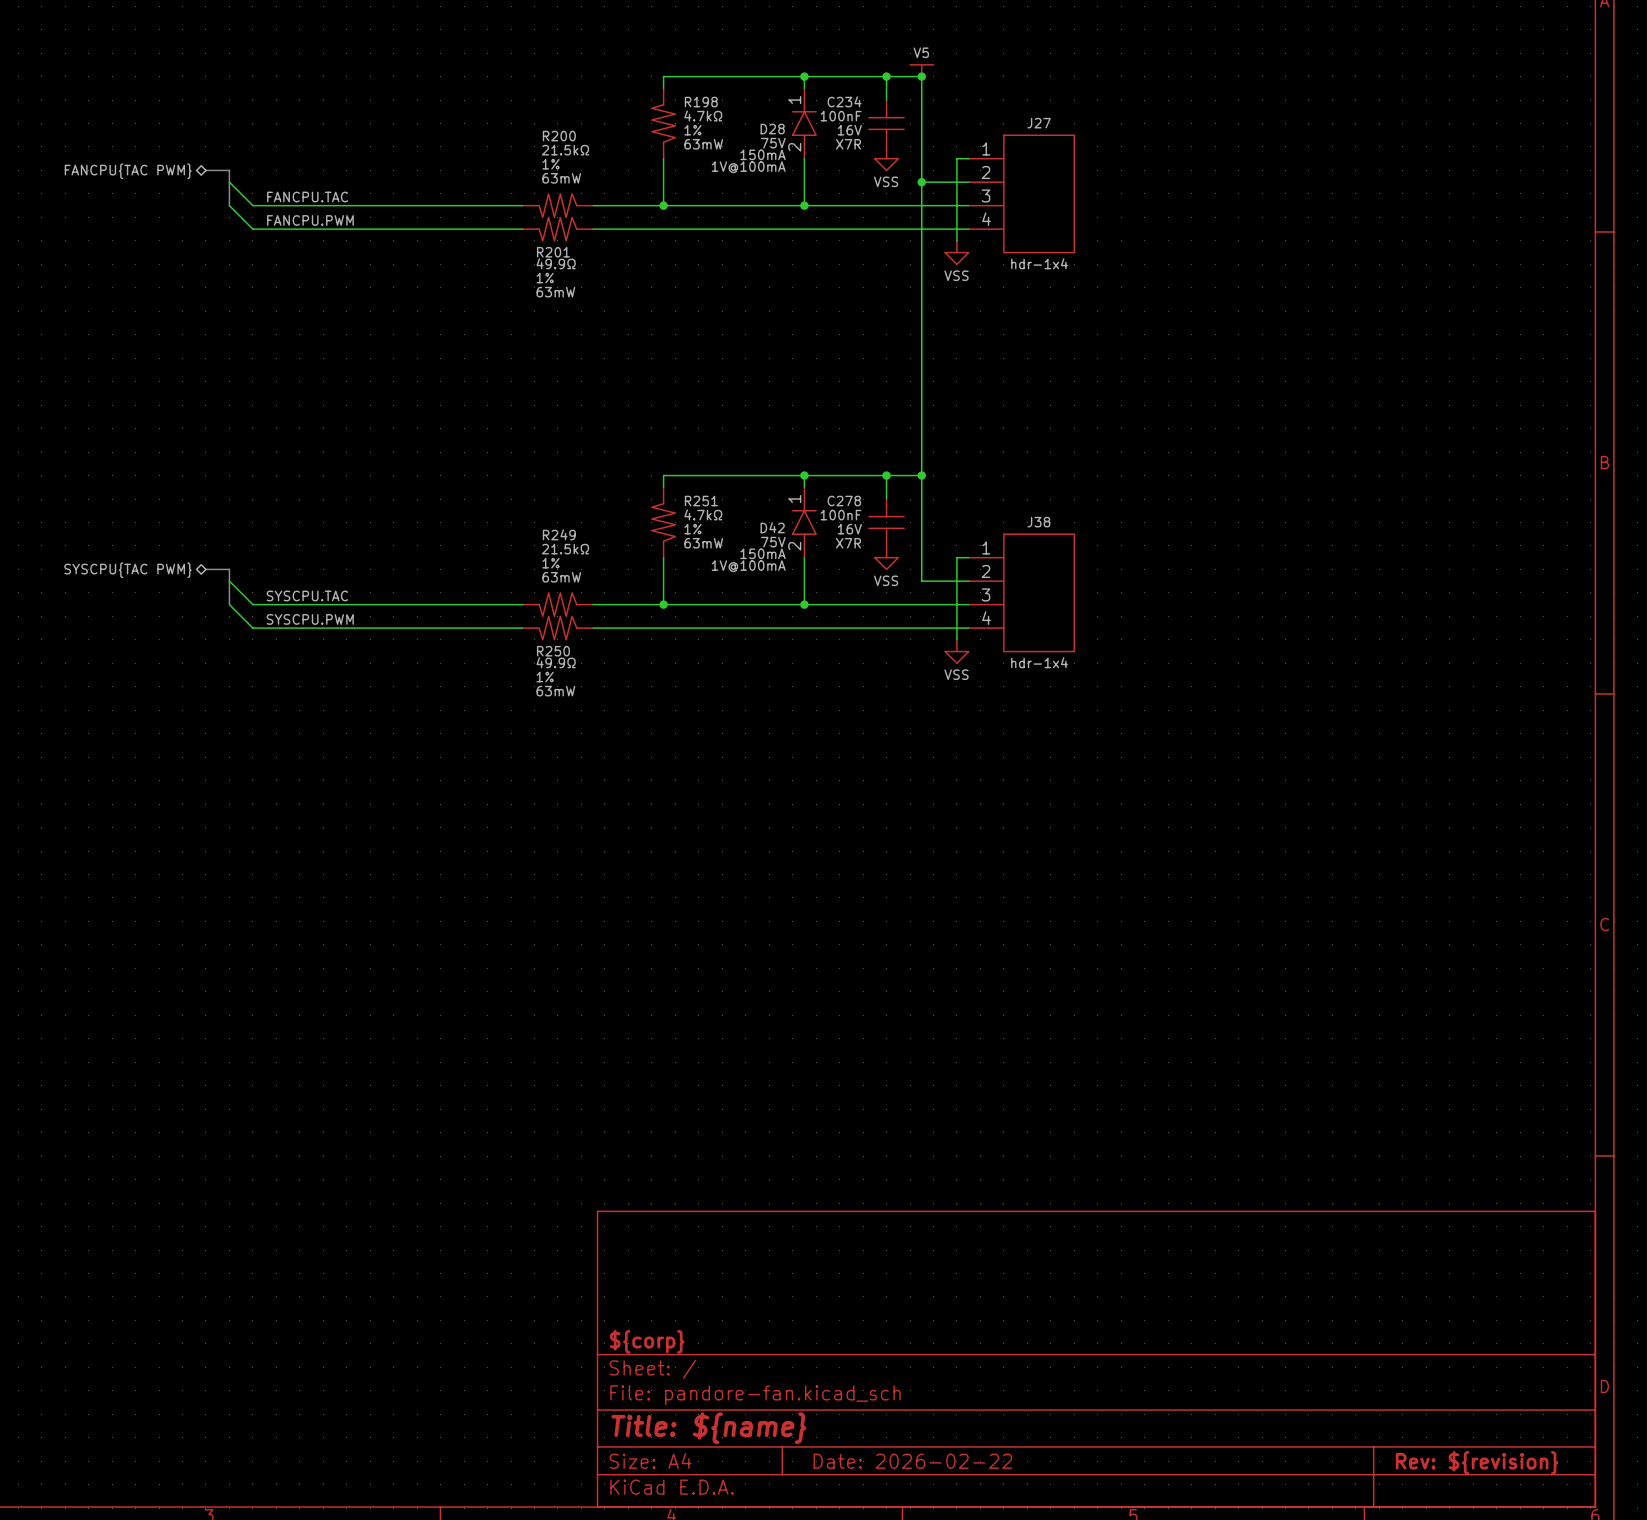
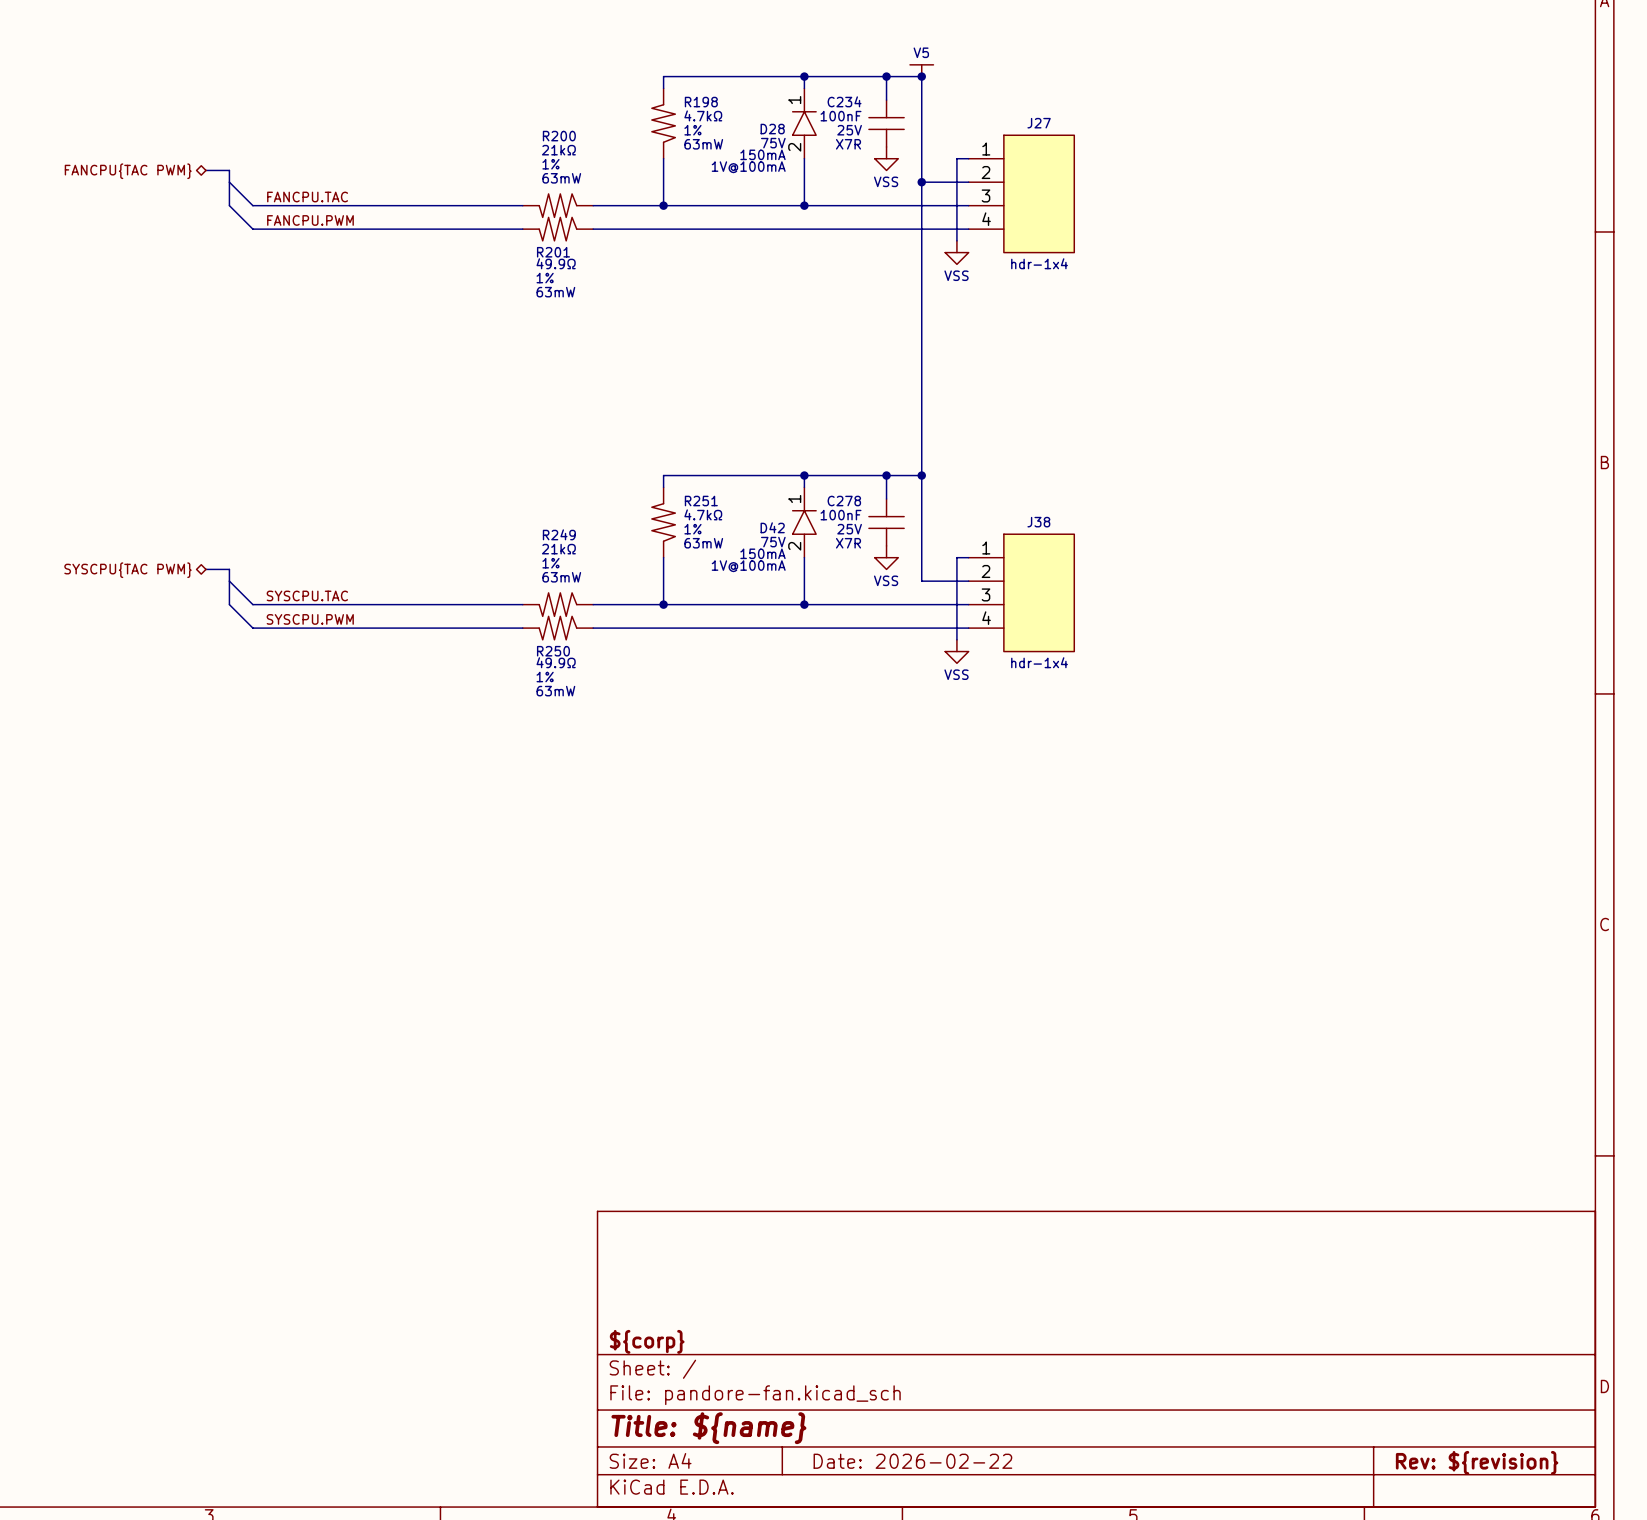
C234 text: 16V (849, 130) -> 25V (849, 130)
R200 text: 21.5kΩ (565, 150) -> 21kΩ (558, 150)
C278 text: 16V (849, 529) -> 25V (849, 529)
R249 text: 21.5kΩ (565, 549) -> 21kΩ (558, 549)

